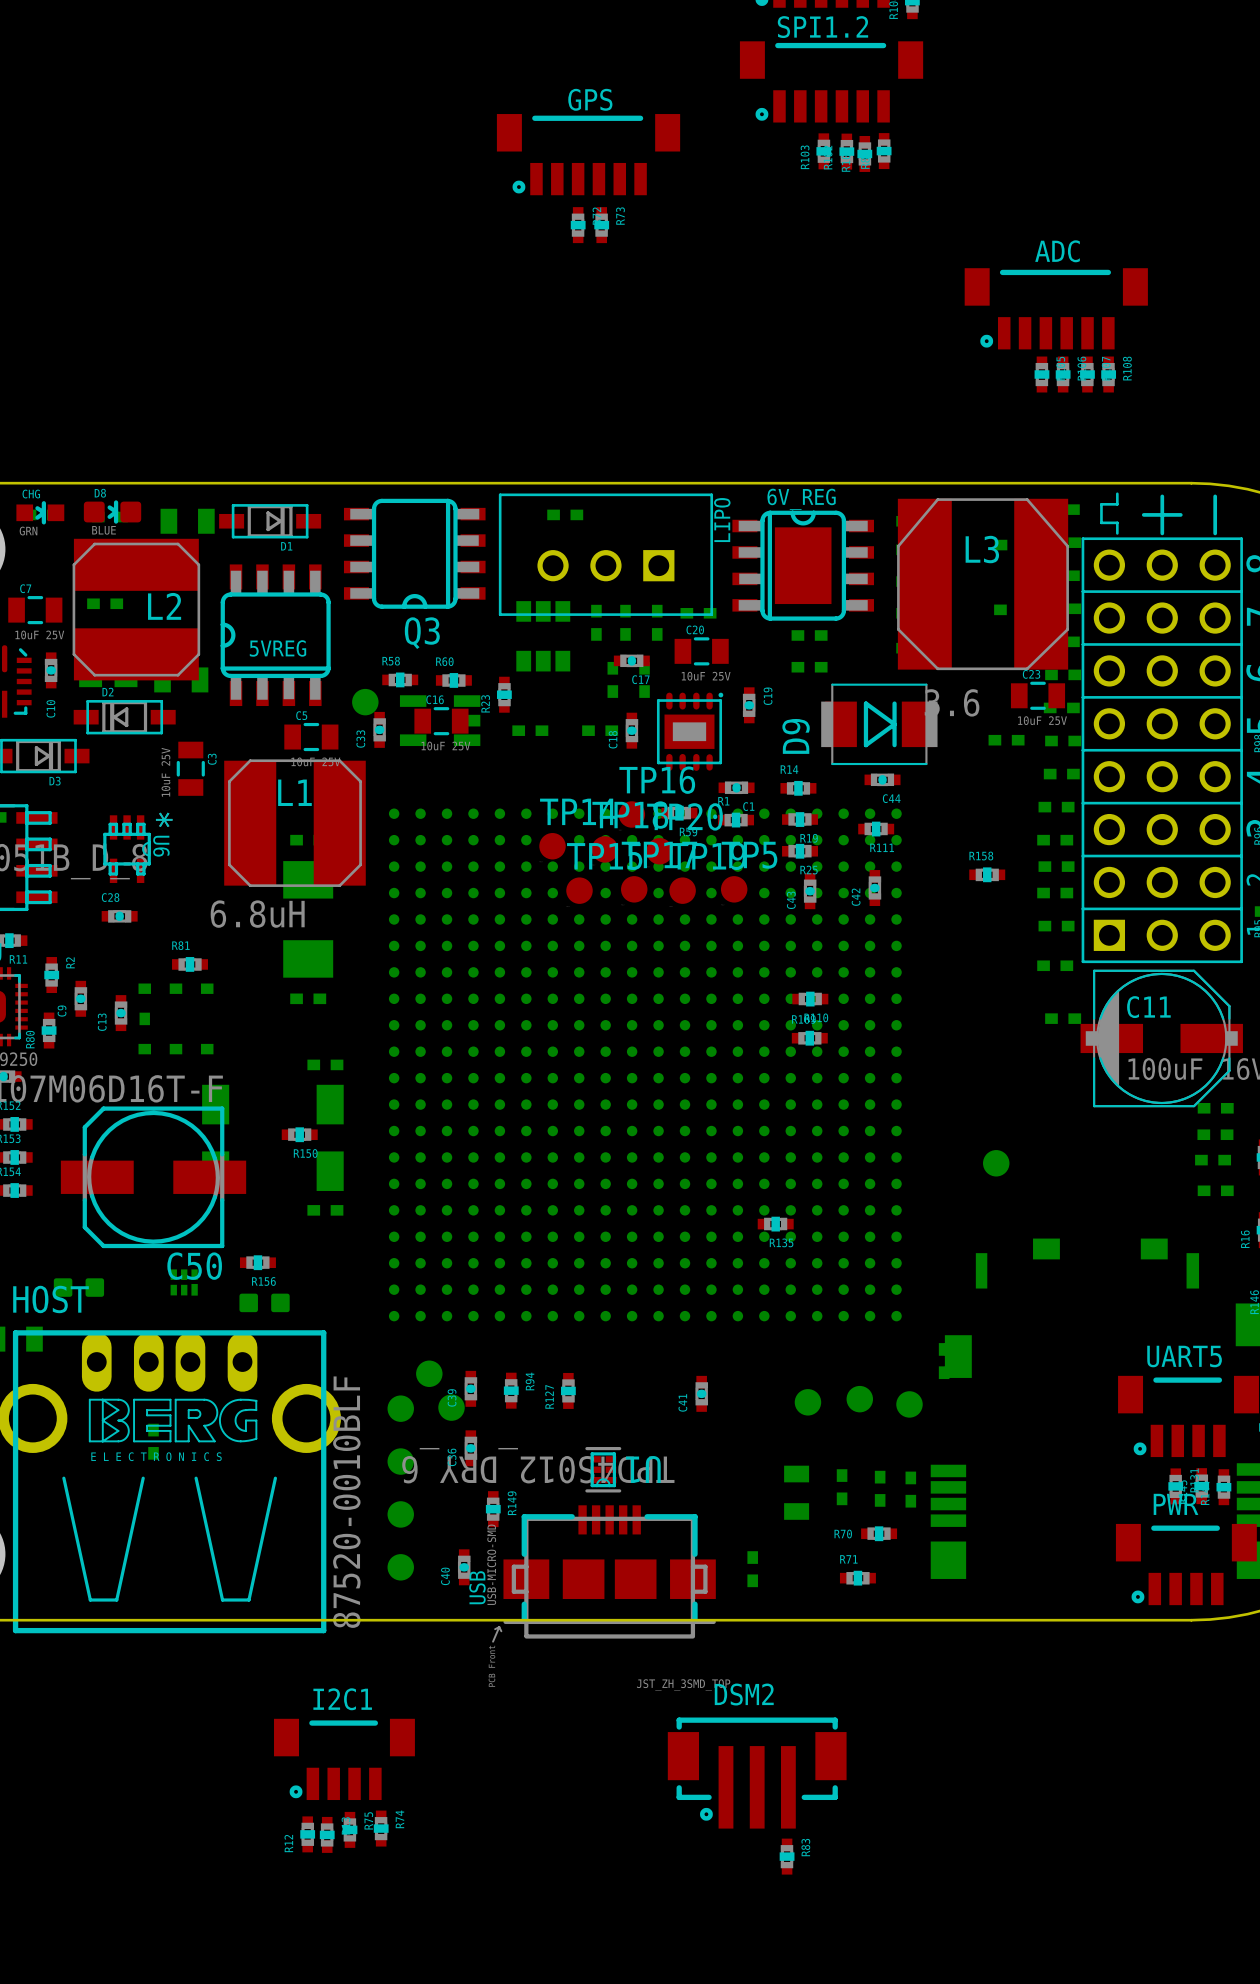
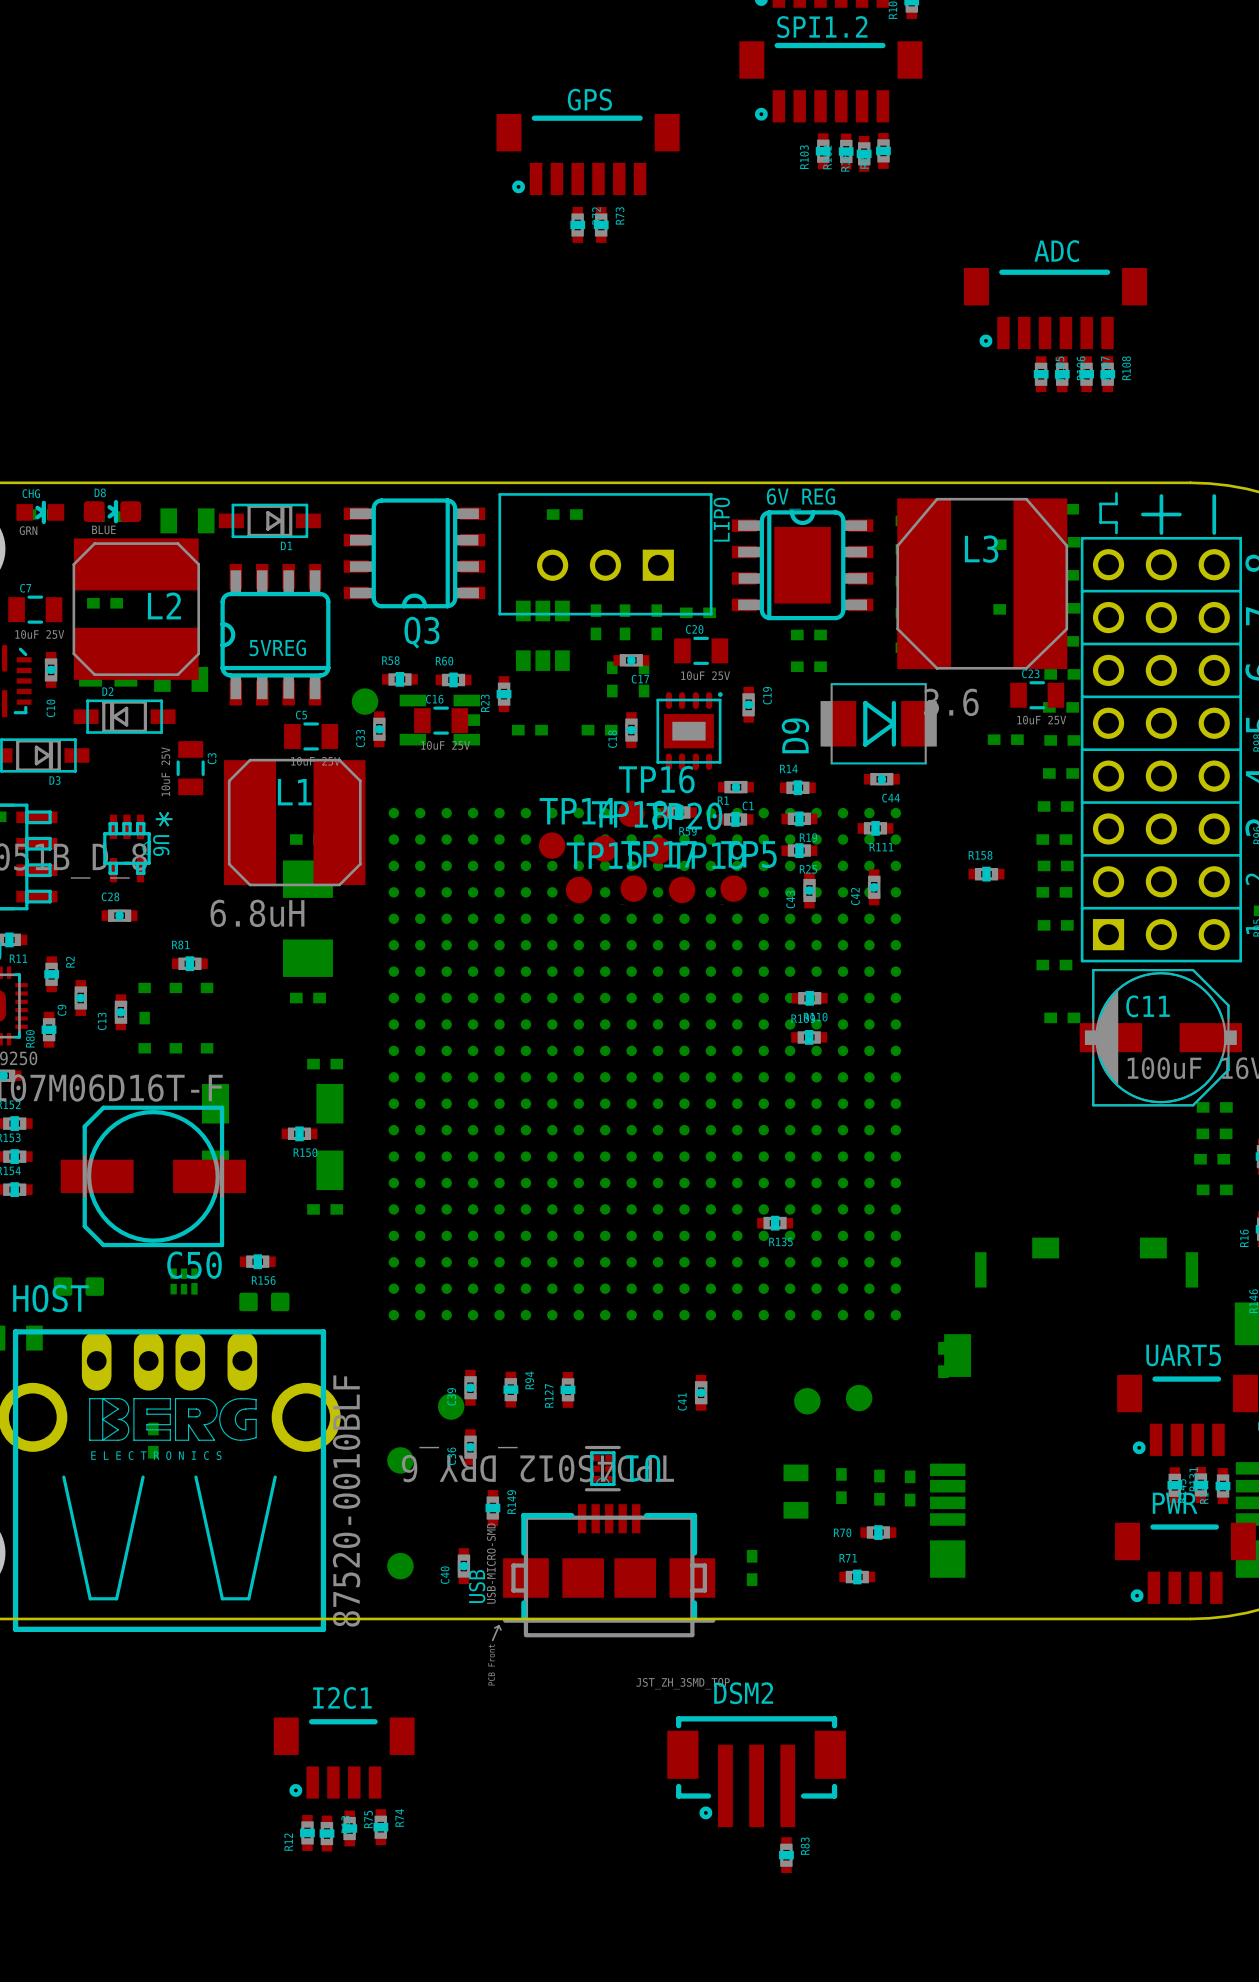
part: (996, 1163) -> none
part: (429, 1373) -> none
part: (909, 1404) -> none
part: (400, 1408) -> none
part: (400, 1514) -> none

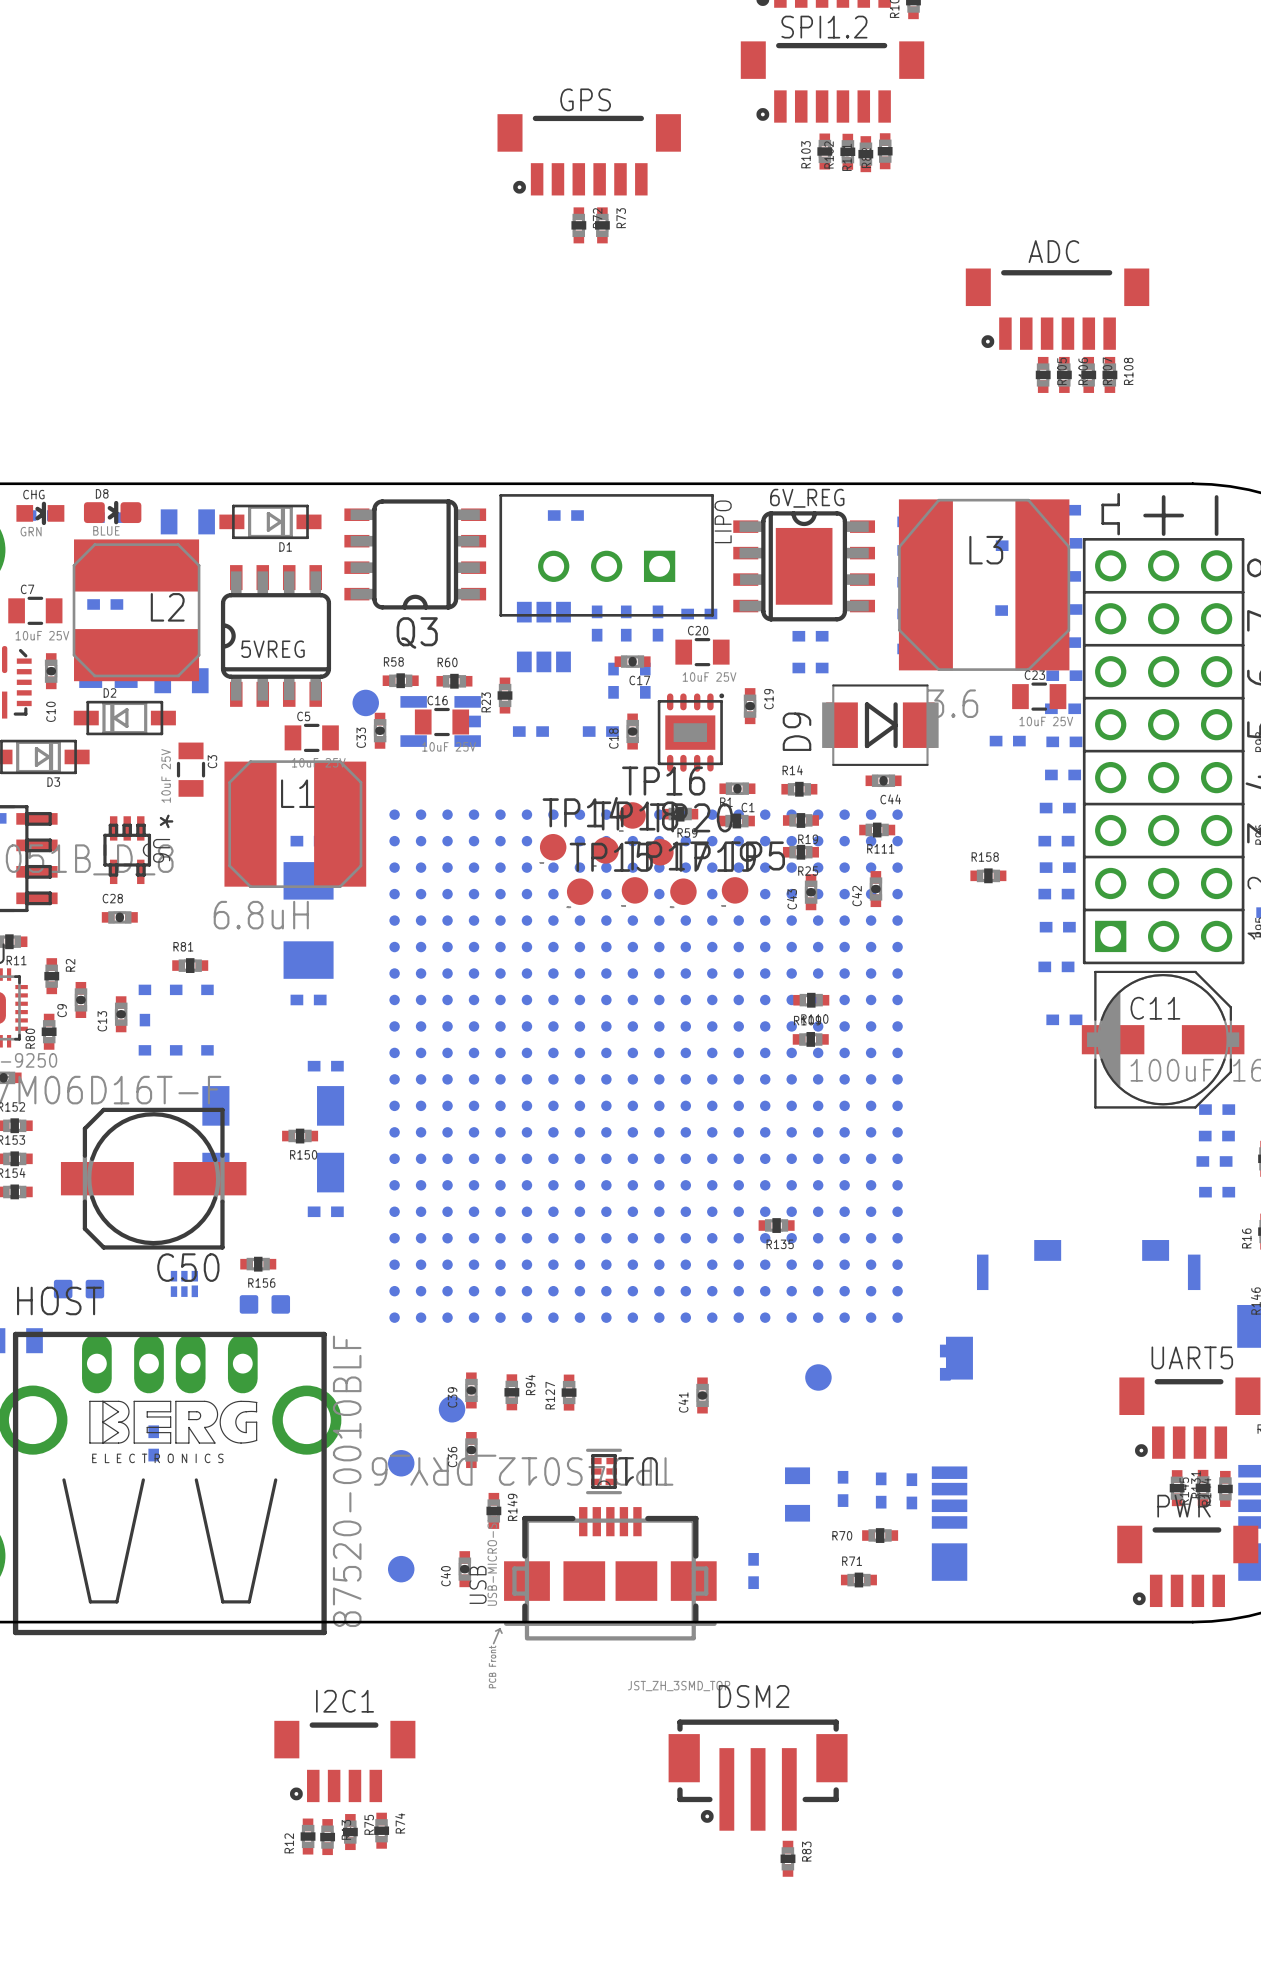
part: none -> (818, 1377)
part: (859, 1398) -> none
part: (807, 1401) -> none

